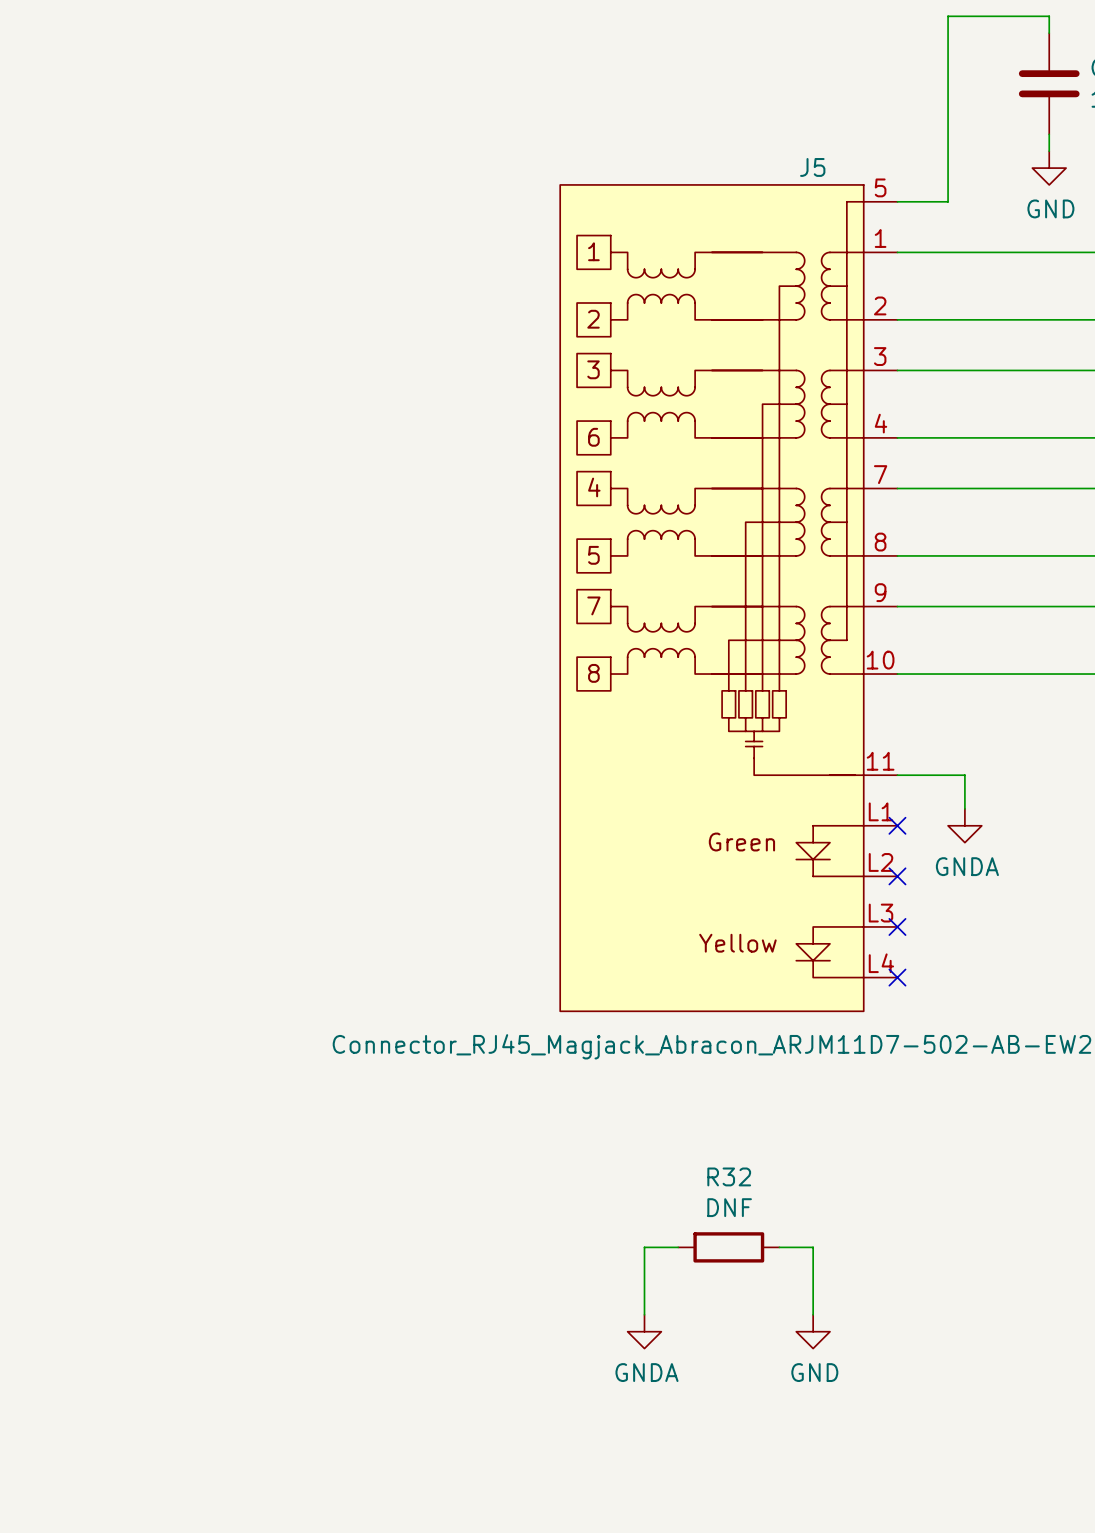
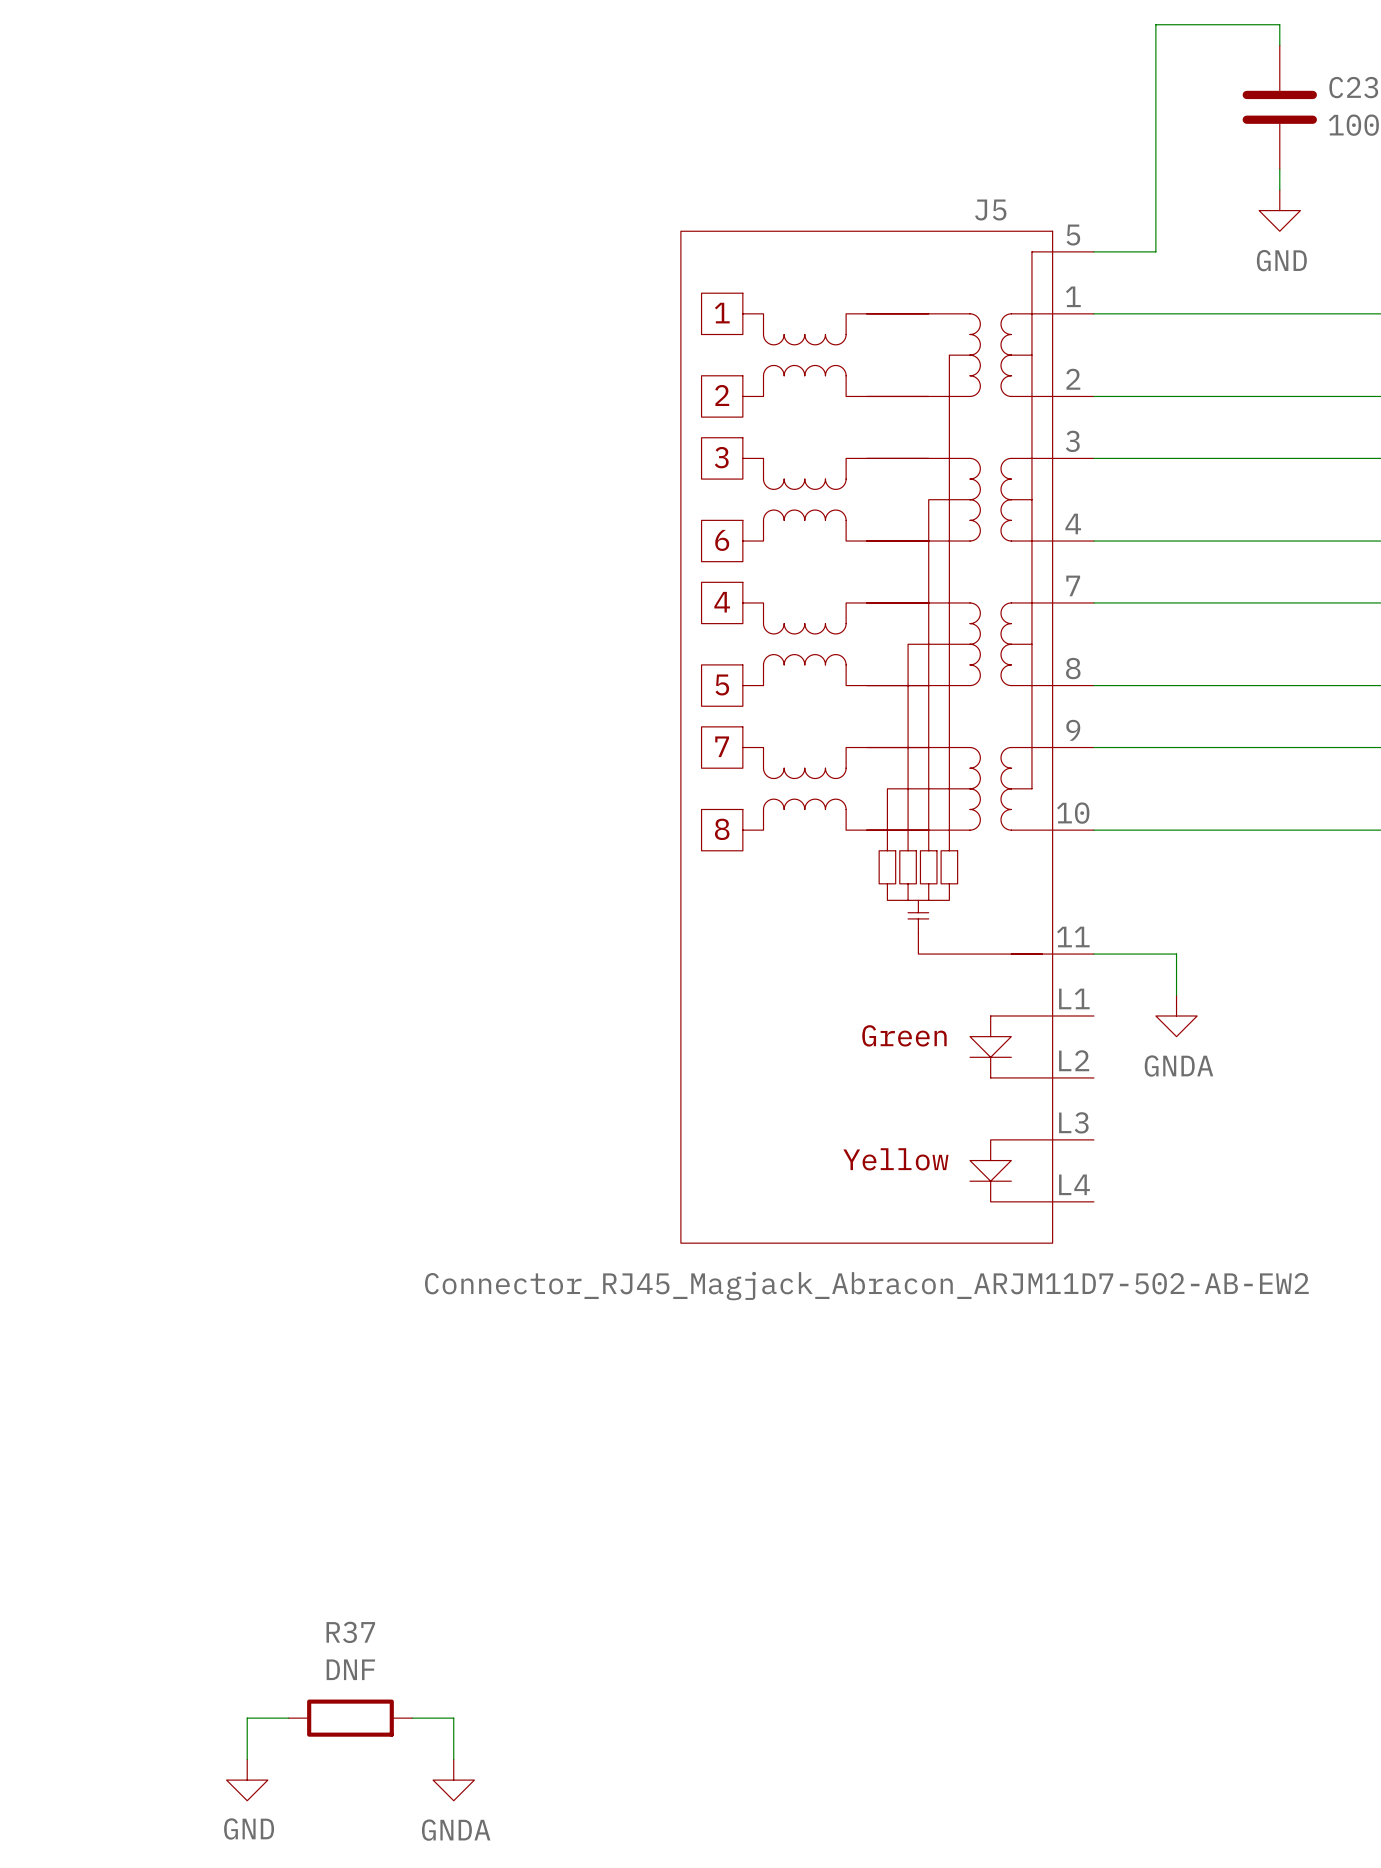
no-connect mark: (897, 825) -> none
no-connect mark: (897, 876) -> none
no-connect mark: (897, 926) -> none
no-connect mark: (897, 977) -> none
wire: (678, 1247) (644, 1247) (644, 1314) -> none
R32: DNF (728, 1247) -> none
wire: (779, 1247) (813, 1247) (813, 1314) -> none
power symbol position: GNDA (644, 1331) -> GNDA (453, 1780)
power symbol: GND (813, 1331) -> none
wire: none -> (288, 1718) (247, 1718) (247, 1759)
R37: none -> DNF (350, 1718)
wire: none -> (412, 1718) (453, 1718) (453, 1759)
power symbol: none -> GND (247, 1780)

